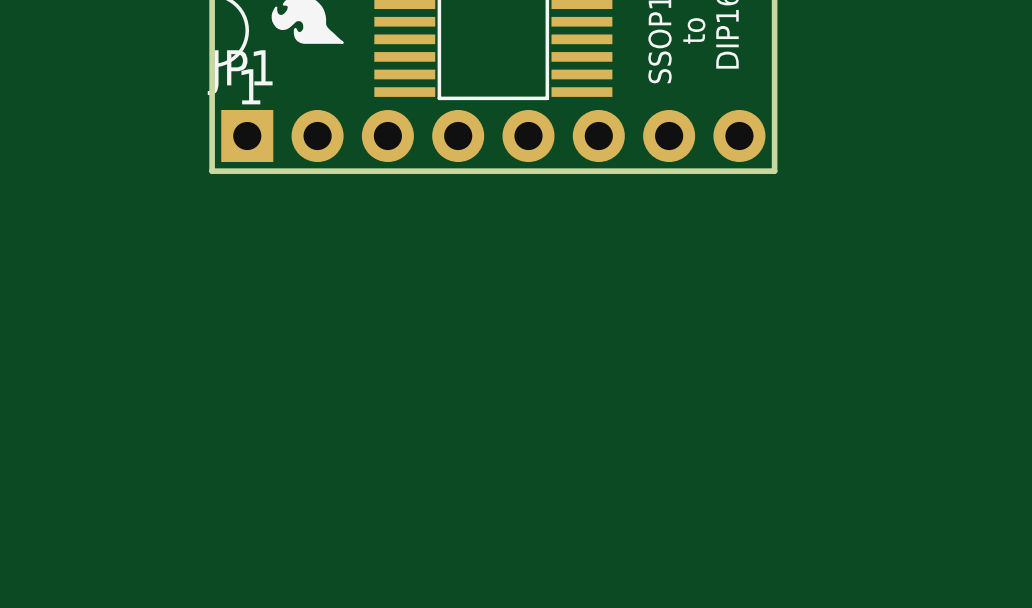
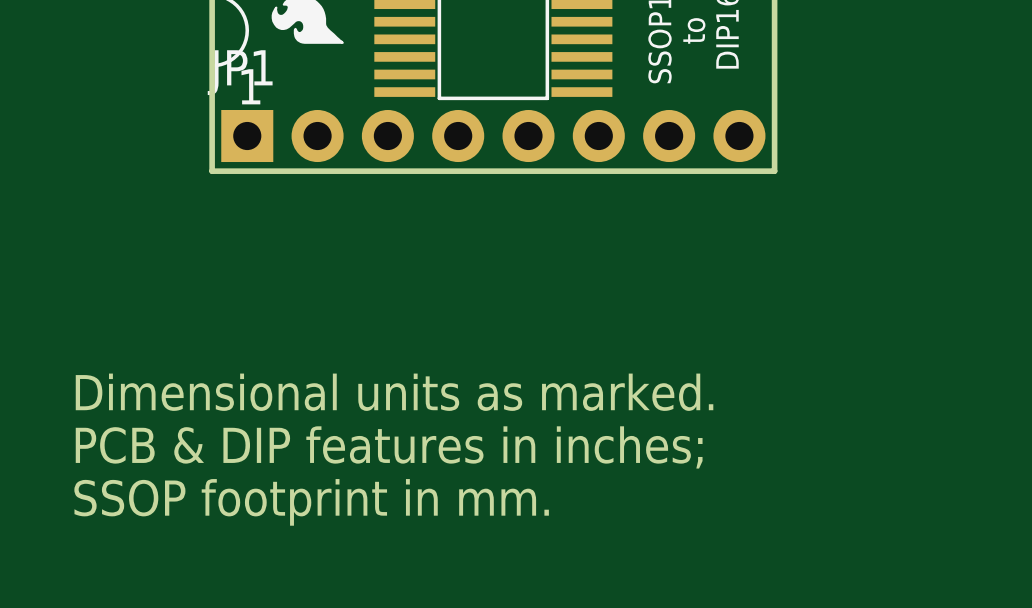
text: none -> Dimensional units as marked. (394, 392)
text: none -> PCB & DIP features in inches; (389, 447)
text: none -> SSOP footprint in mm. (311, 502)

